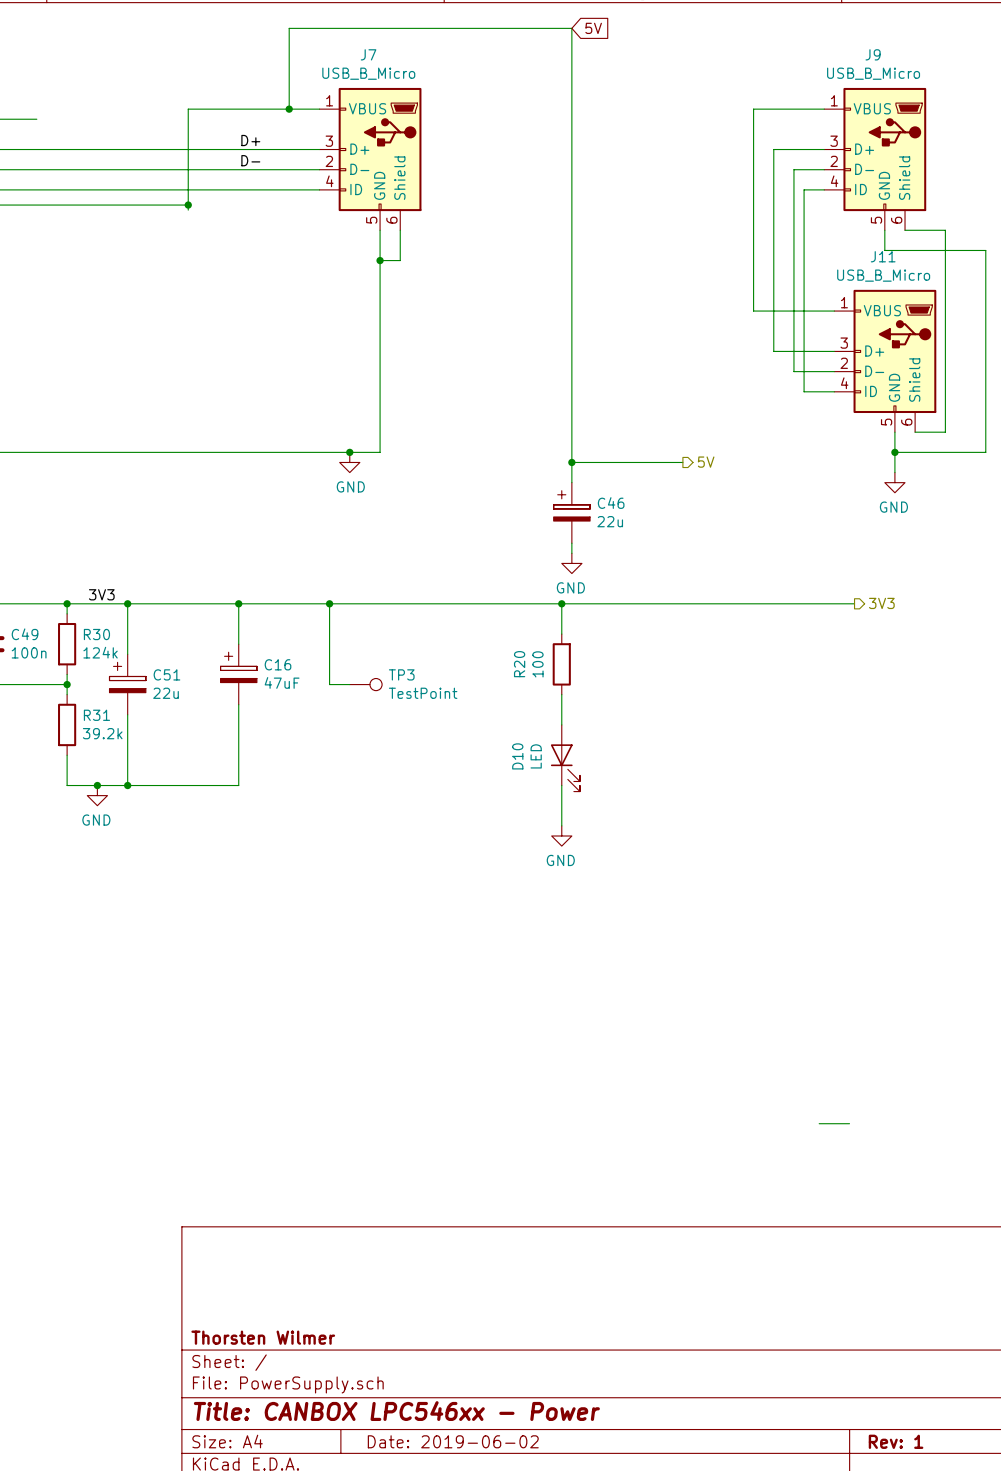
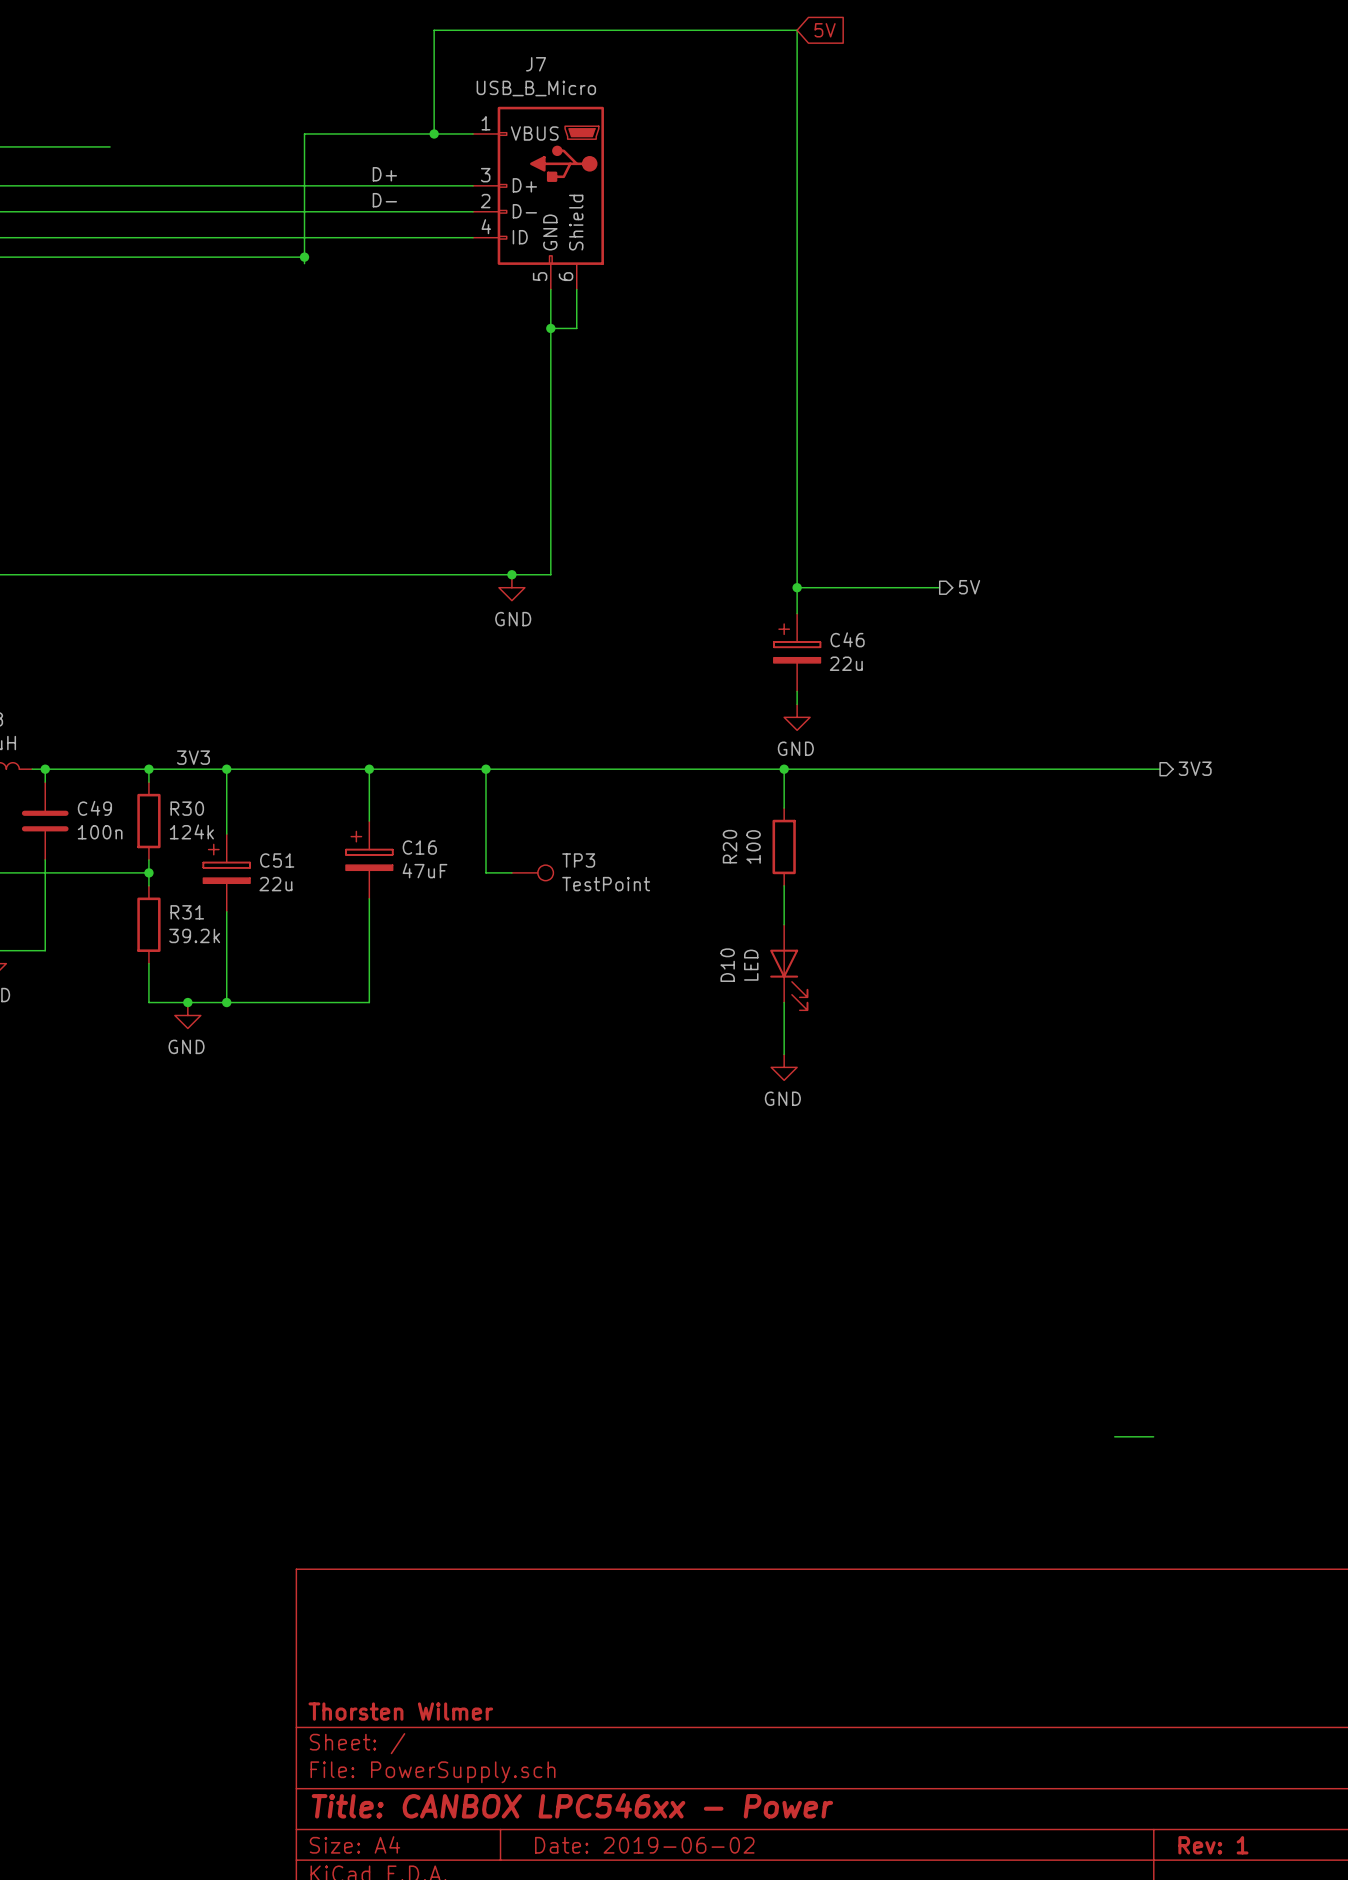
wire: (824, 109) (753, 109) (753, 311) (834, 311) -> none
wire: (824, 149) (773, 149) (773, 351) (834, 351) -> none
J9: USB_B_Micro (875, 159) -> none
wire: (824, 169) (793, 169) (793, 371) (834, 371) -> none
wire: (824, 189) (804, 189) (804, 391) (834, 391) -> none
wire: (884, 230) (884, 250) (985, 250) (985, 452) (894, 452) -> none
wire: (905, 230) (945, 230) (945, 432) (915, 432) -> none
J11: USB_B_Micro (885, 361) -> none
wire: (894, 432) (894, 472) -> none
junction: (894, 452) -> none
power symbol: GND (894, 482) -> none

